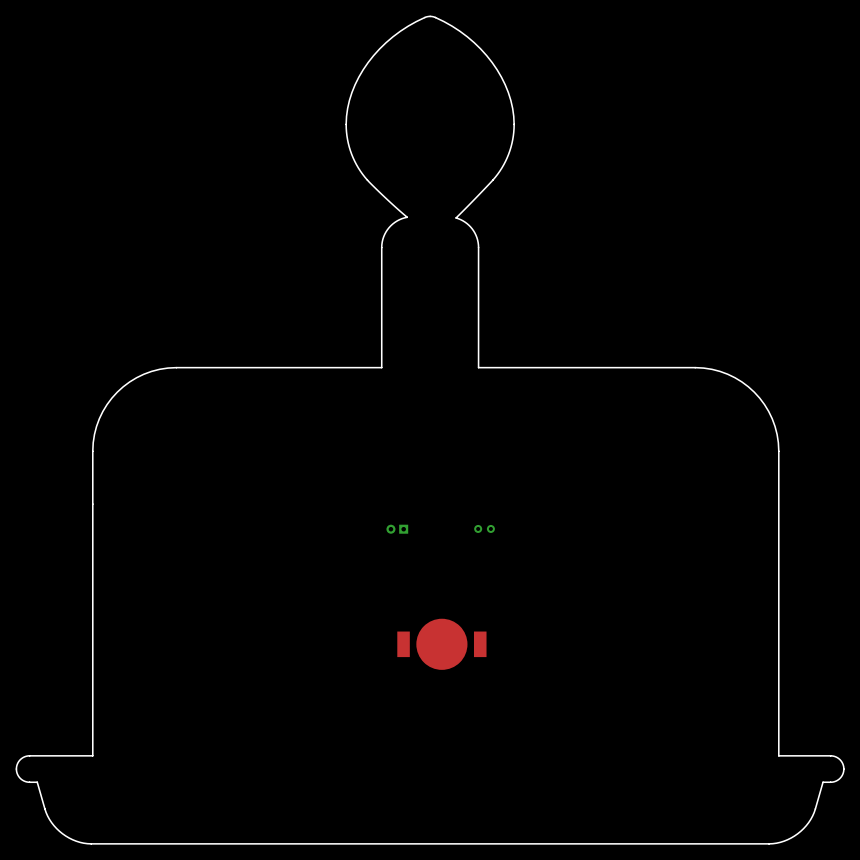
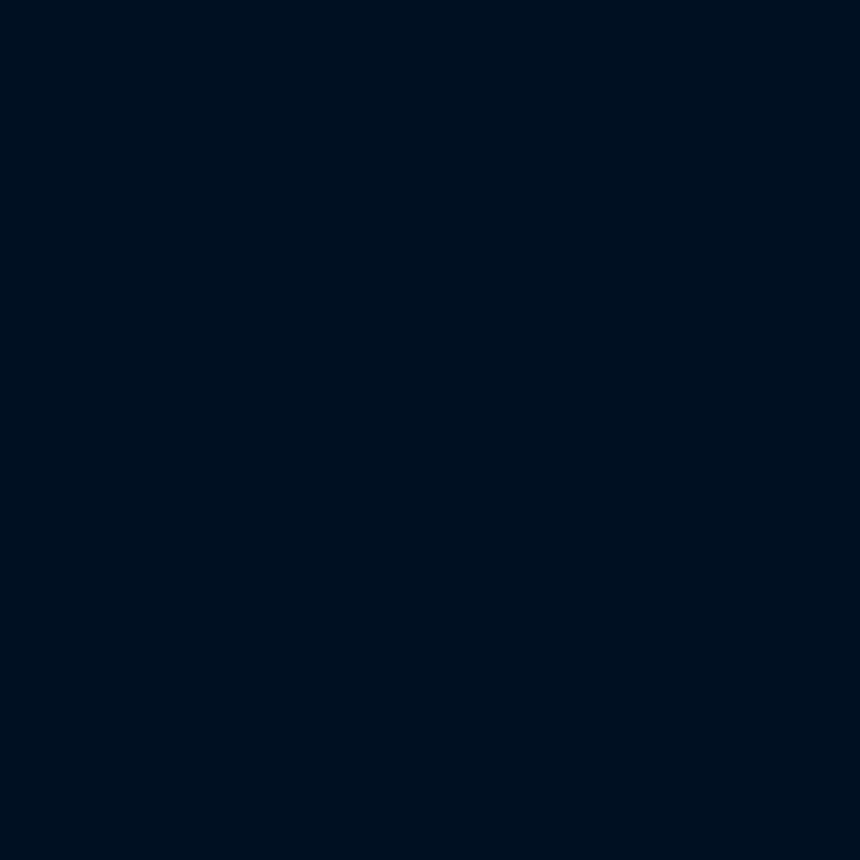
board edge: (430, 16) (416, 21) (400, 31) (373, 55) (355, 84) (346, 116) (348, 143) (358, 167) (370, 183) (407, 217) (390, 225) (382, 242) (381, 367) (176, 367) (159, 369) (143, 374) (123, 386) (107, 404) (99, 418) (94, 434) (92, 451) (92, 755) (26, 756) (19, 760) (16, 767) (17, 774) (22, 779) (37, 782) (49, 819) (59, 831) (72, 839) (91, 843) (772, 843) (787, 839) (803, 828) (814, 812) (823, 782) (835, 781) (842, 774) (842, 763) (834, 756) (778, 755) (778, 442) (772, 418) (759, 398) (748, 386) (735, 377) (720, 371) (703, 368) (478, 367) (478, 242) (470, 226) (456, 217) (492, 180) (503, 164) (512, 139) (513, 116) (505, 84) (486, 55) (459, 31) (443, 21) (430, 16) -> none
part: (484, 528) -> none
part: (397, 529) -> none
part: (441, 644) -> none

